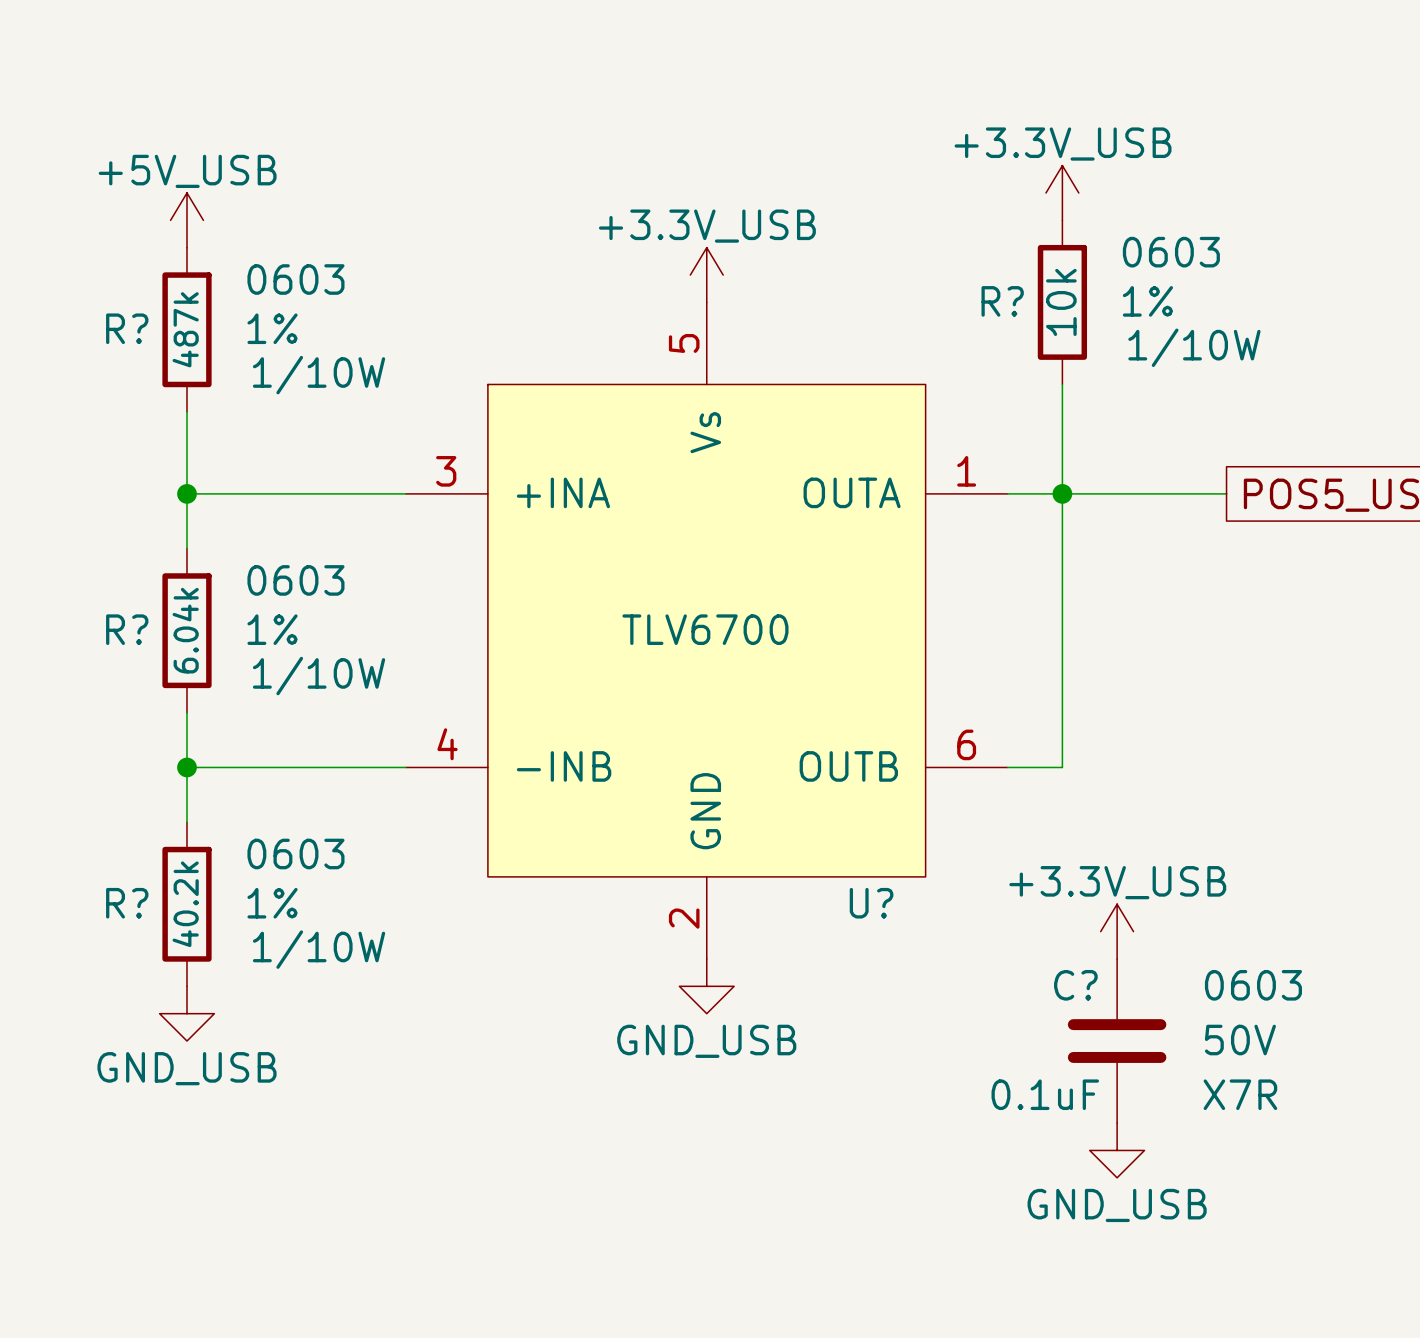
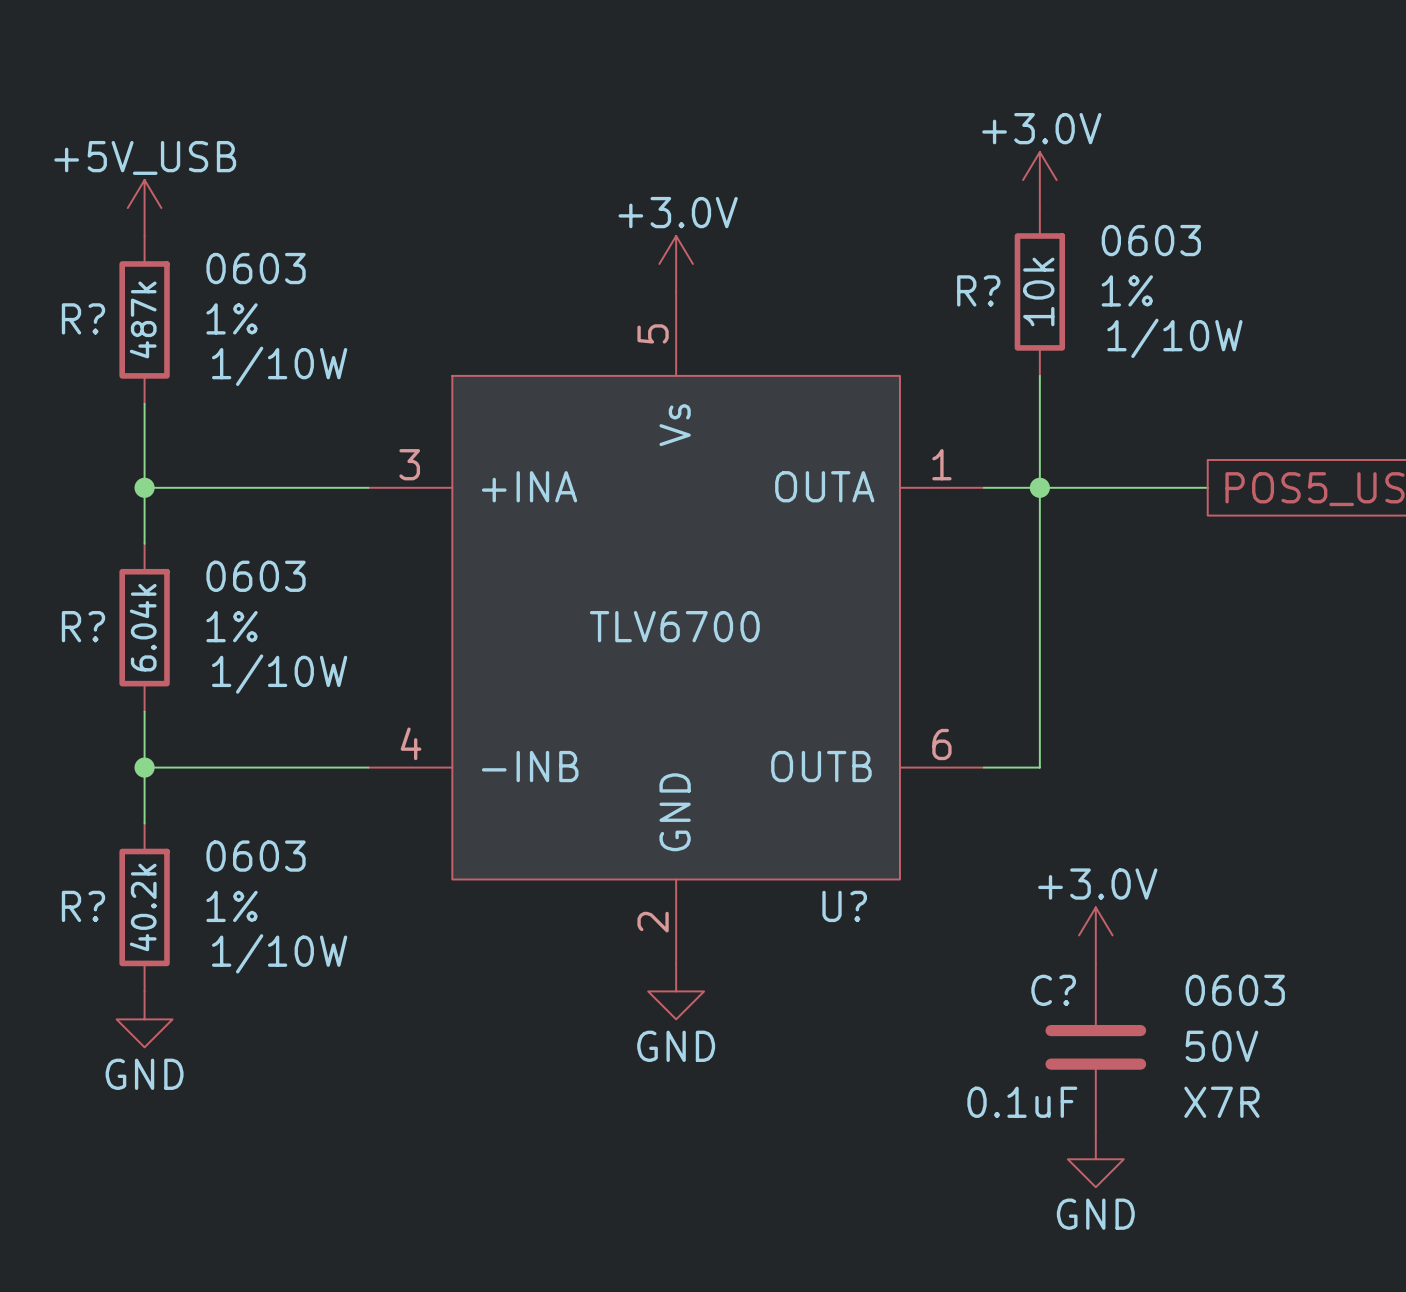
power symbol: +3.3V_USB (1062, 192) -> +3.0V (1039, 180)
power symbol: +3.3V_USB (706, 275) -> +3.0V (676, 263)
power symbol: +3.3V_USB (1117, 931) -> +3.0V (1095, 935)
power symbol: GND_USB (706, 986) -> GND (676, 991)
power symbol: GND_USB (186, 1013) -> GND (144, 1019)
power symbol: GND_USB (1117, 1150) -> GND (1095, 1159)

